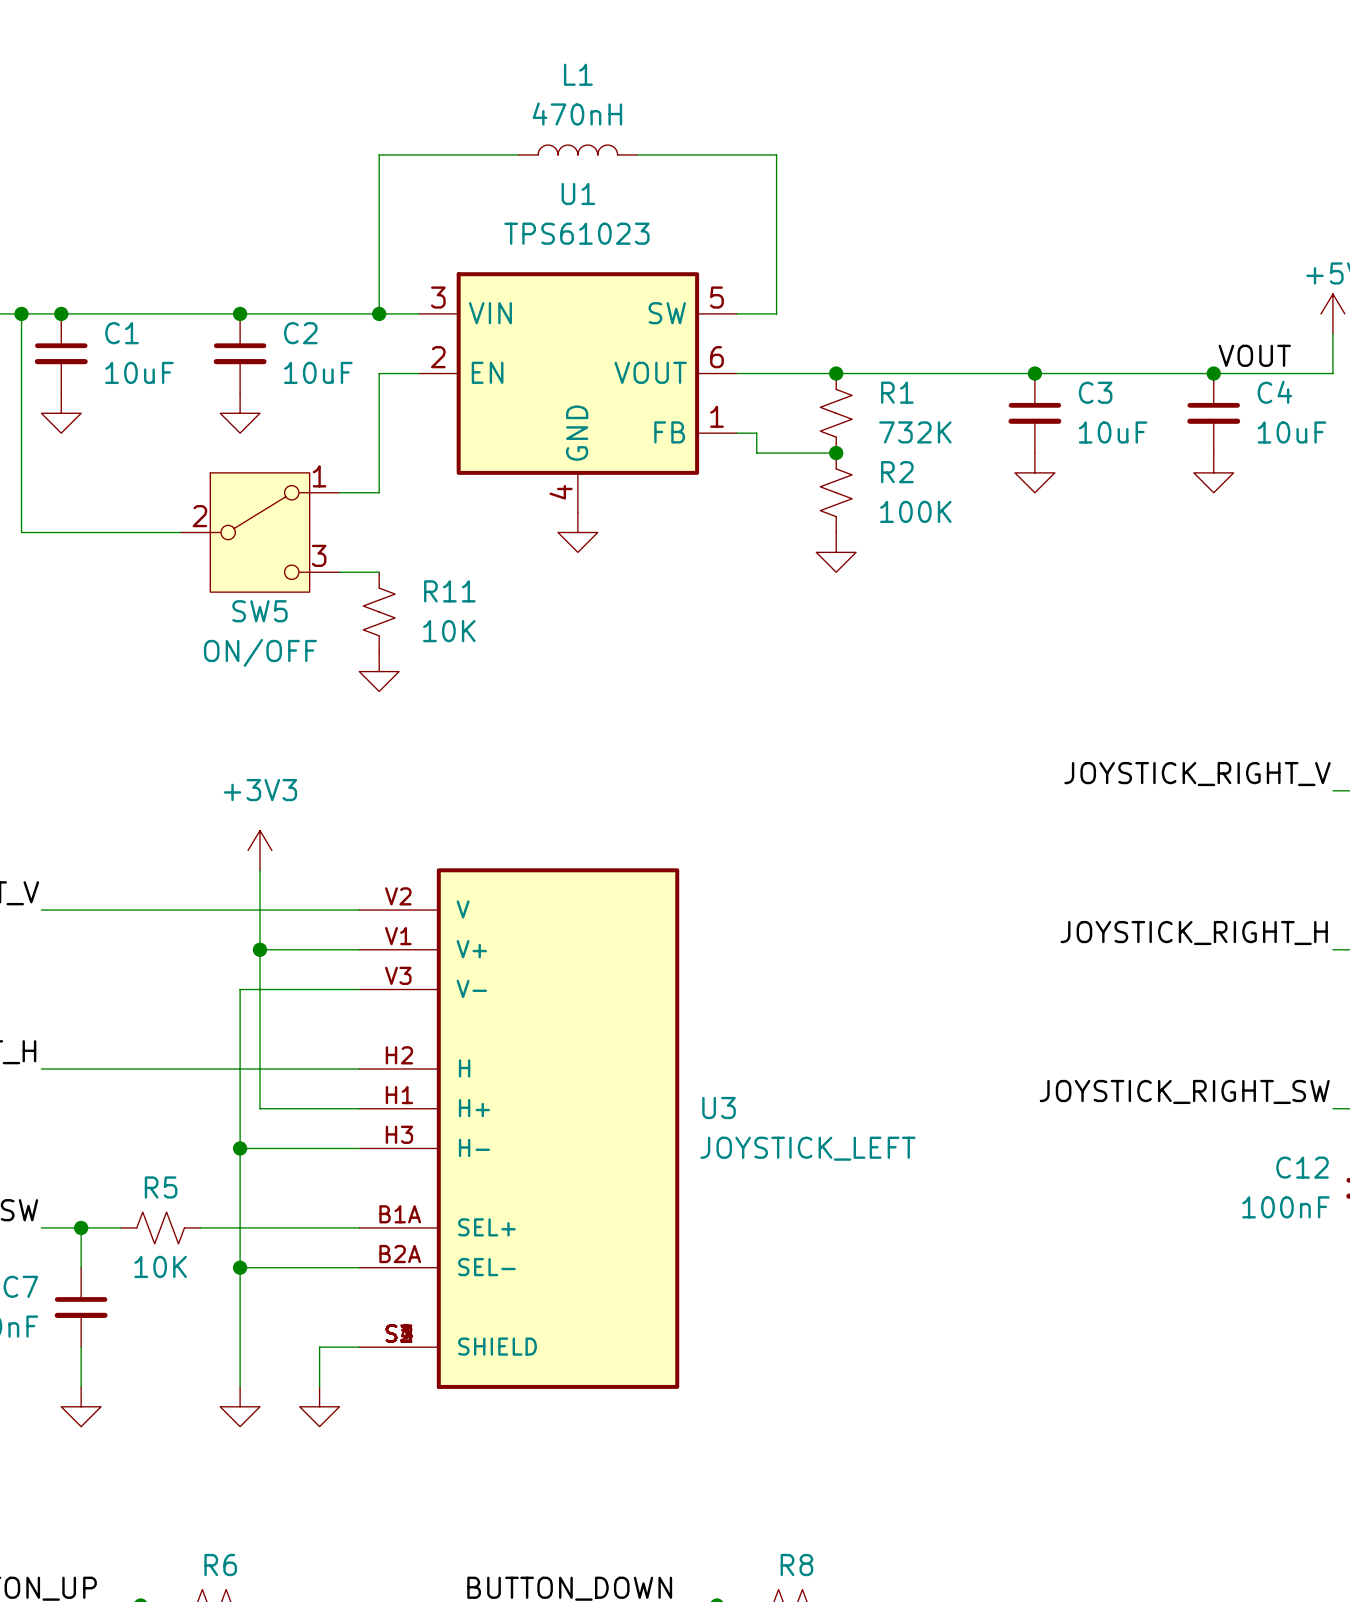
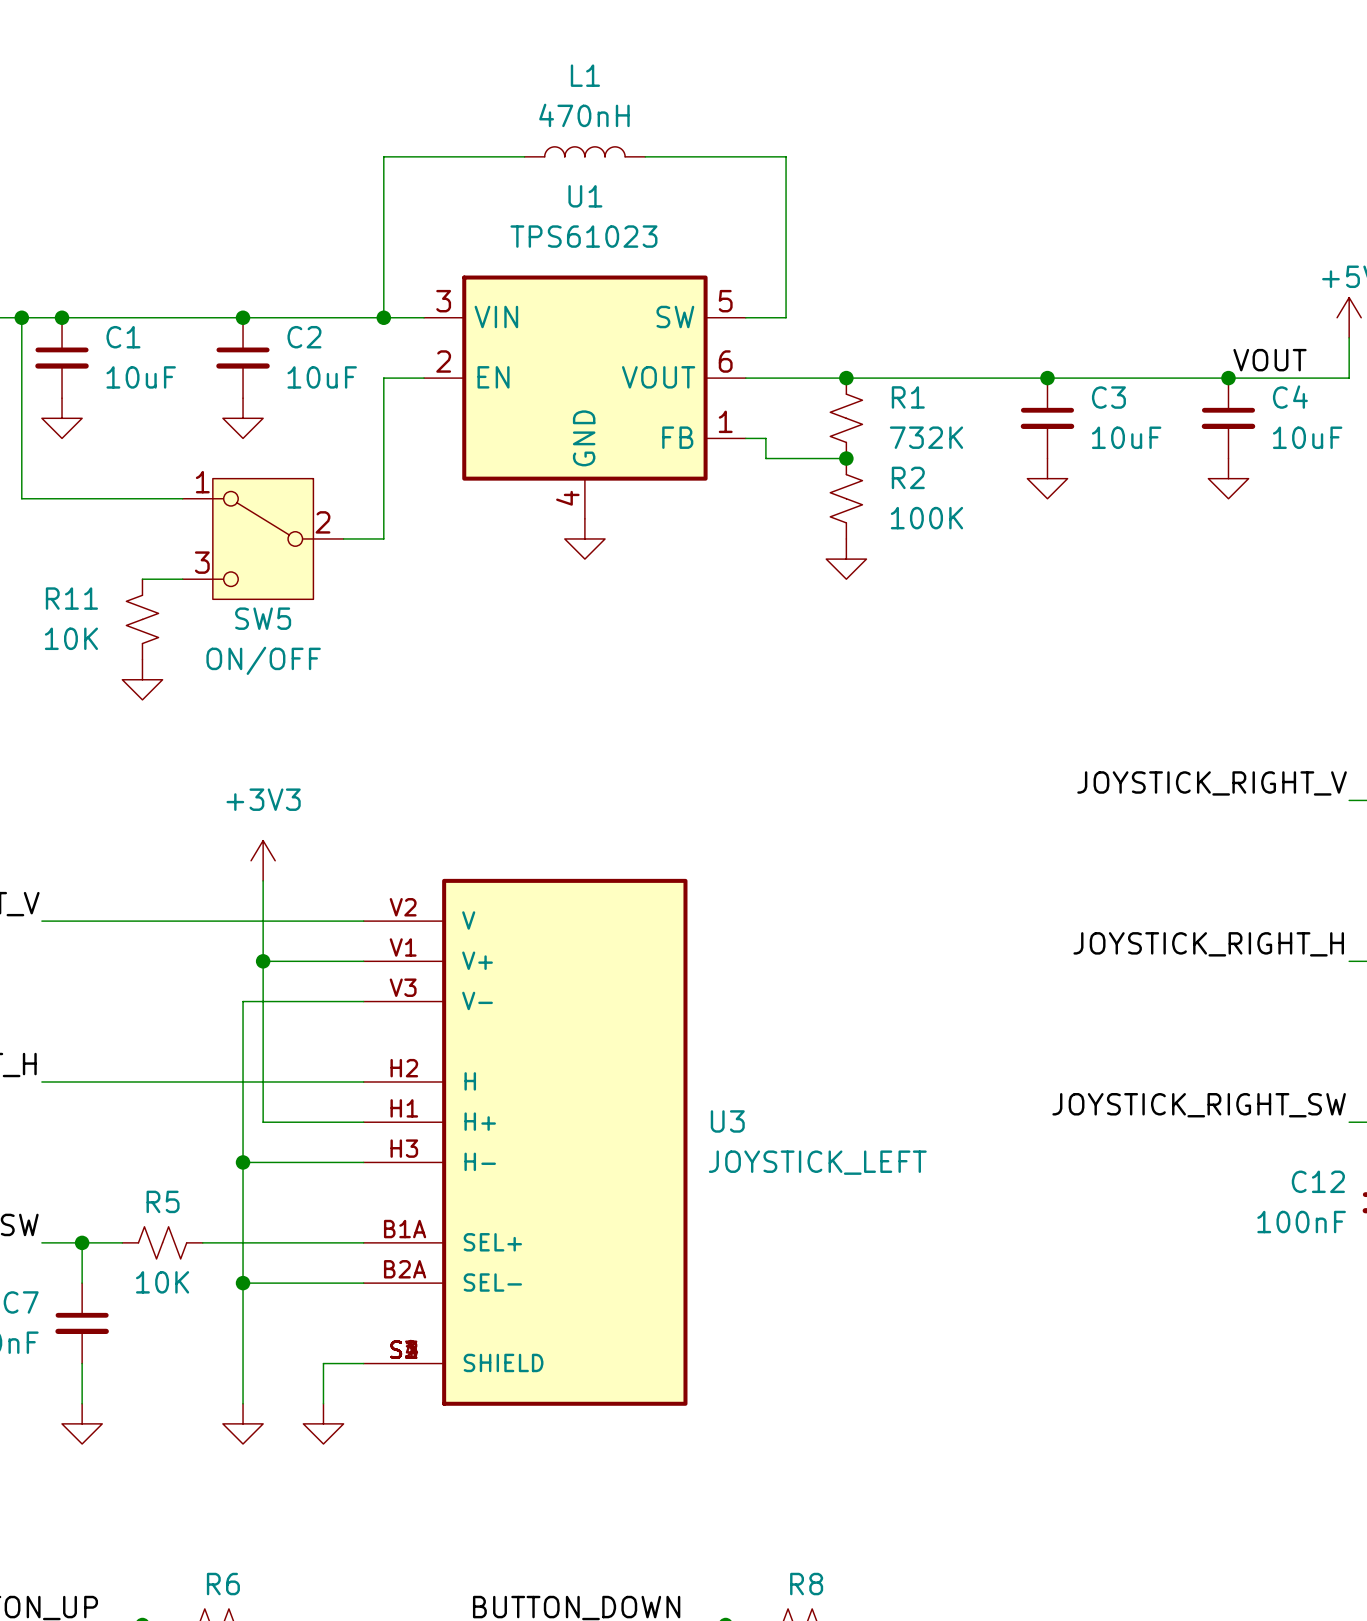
wire: (21, 492) (21, 532) (180, 532) -> (21, 498) (182, 498)
wire: (339, 492) (379, 492) -> (343, 538) (383, 538) (383, 498)
SW5 flip: as is (259, 532) -> left-right (263, 538)
wire: (339, 572) (379, 572) -> (142, 579) (182, 579)
R11 flip: as is (379, 611) -> left-right (142, 619)
R11 position: (379, 611) -> (142, 619)
power symbol position: (379, 671) -> (142, 679)

